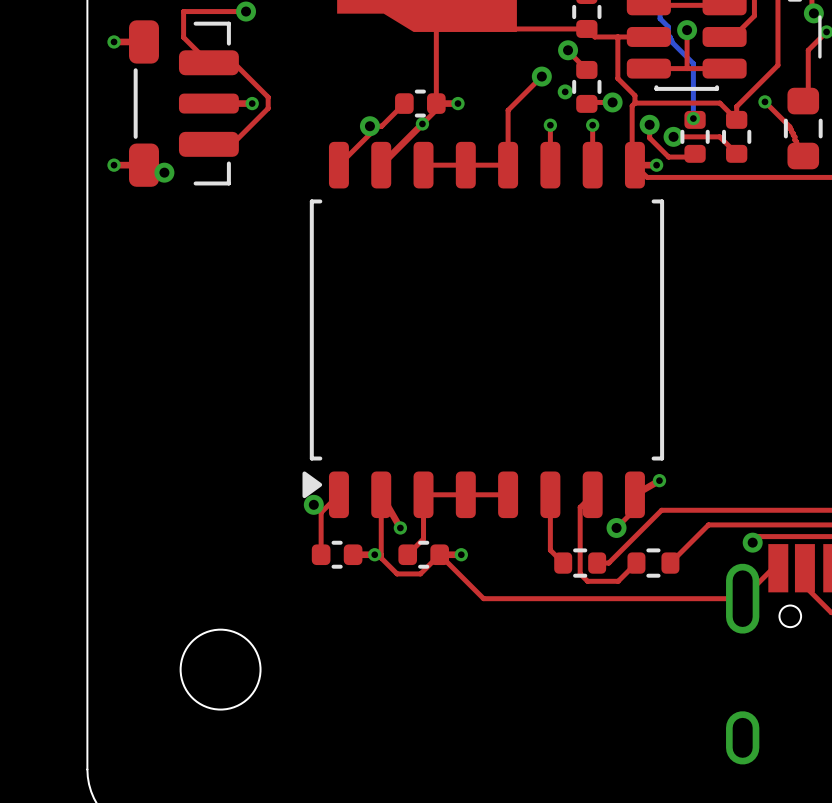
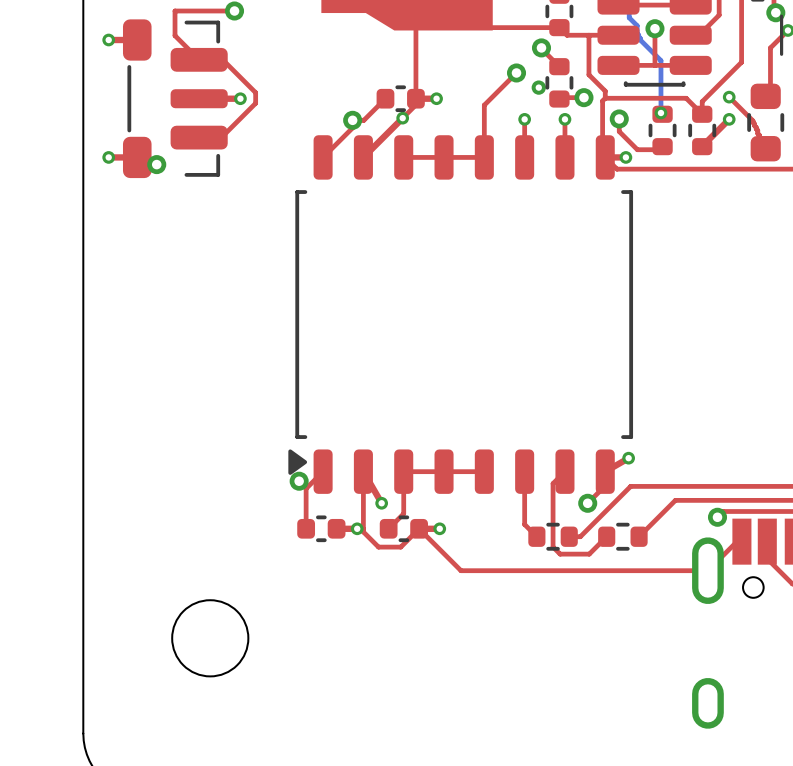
via: none -> (729, 119)
top track: (673, 136) (719, 136) (736, 153) -> (729, 119) (702, 146)
via: (673, 136) -> none

